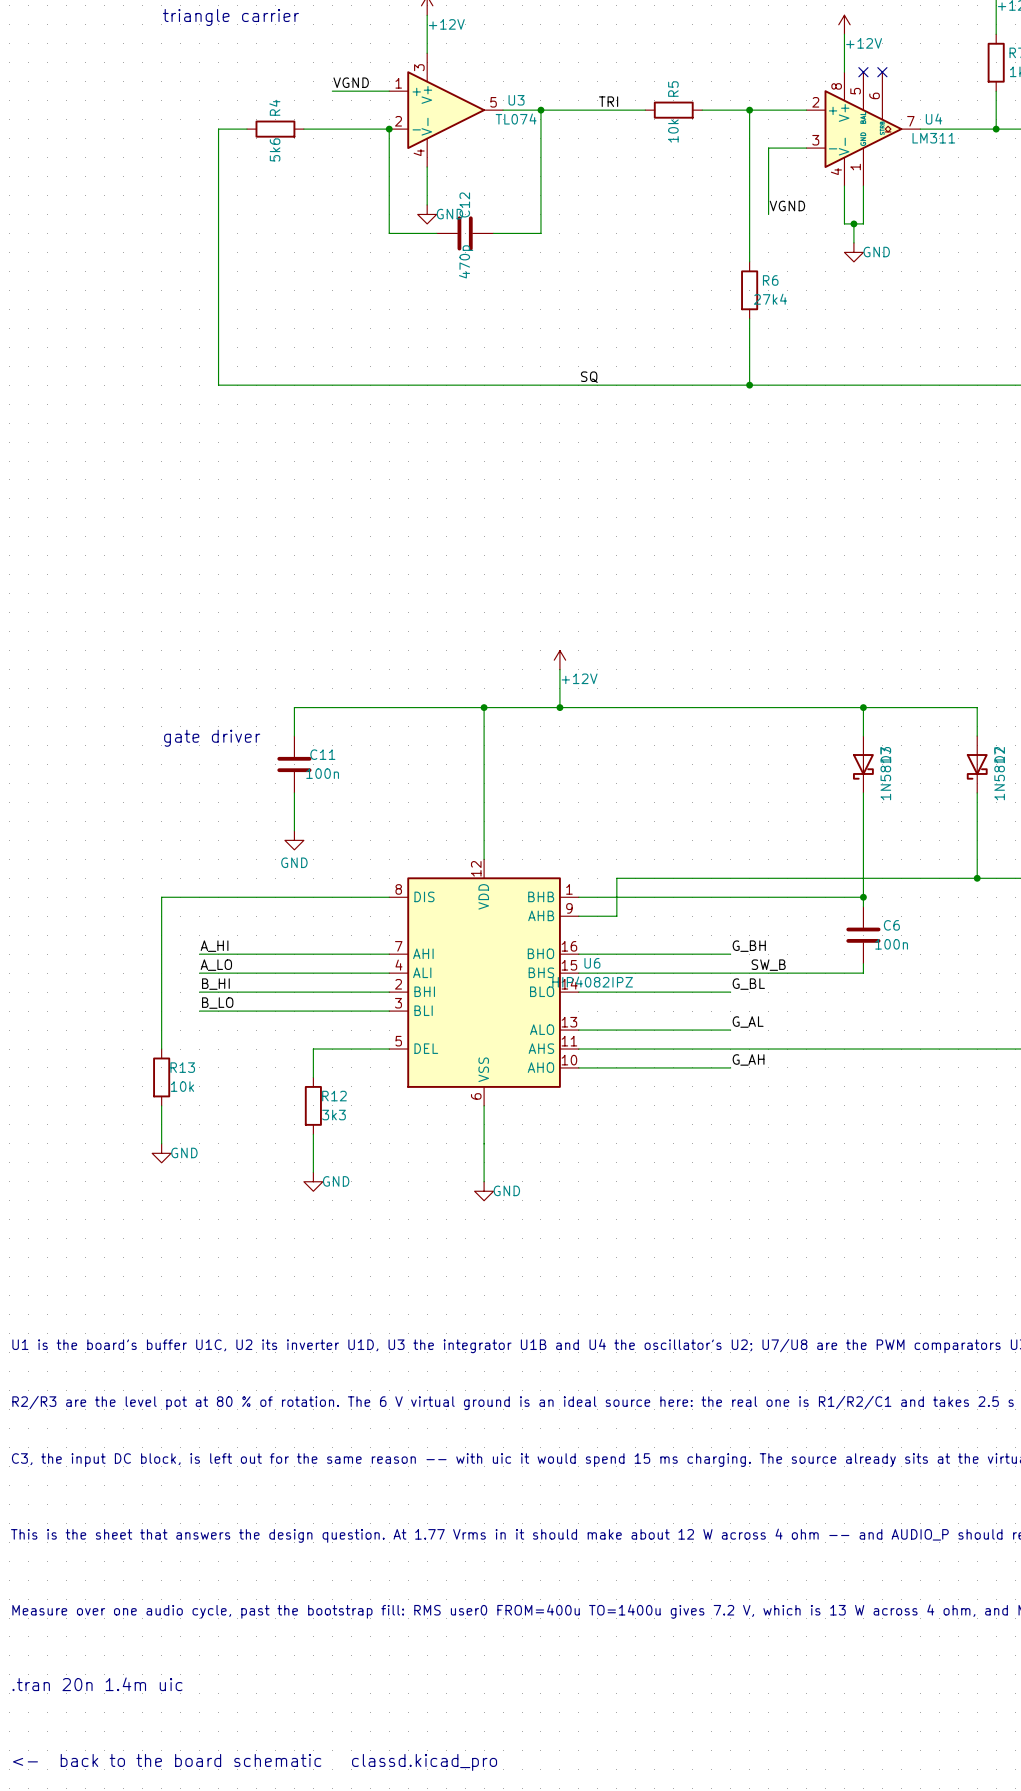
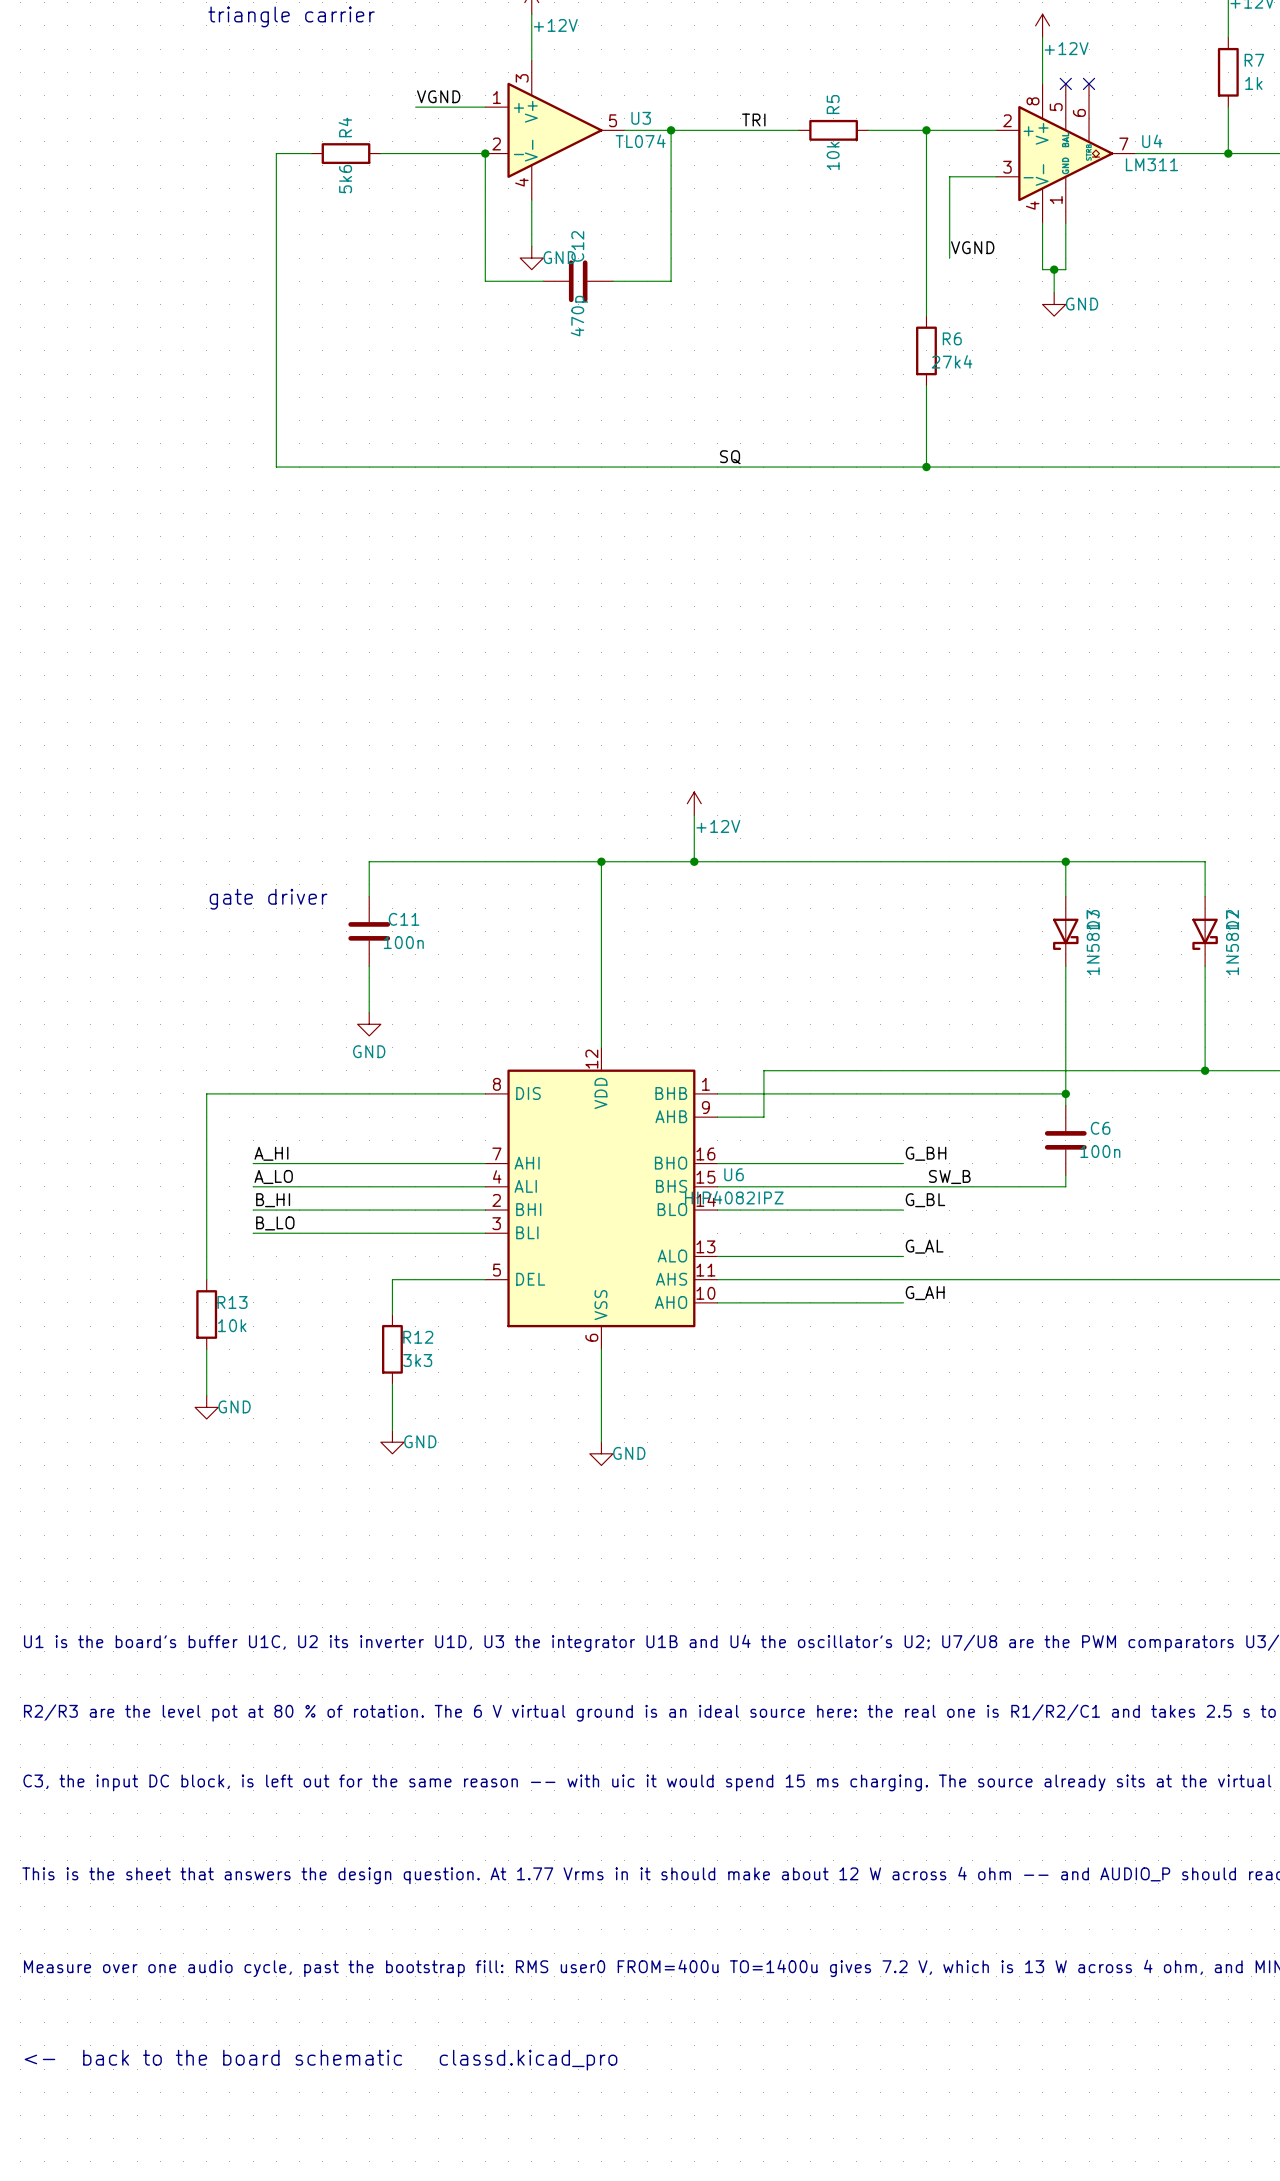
text: .tran 20n 1.4m uic (97, 1684) -> <- back to the board schematic classd.kicad_pro (321, 2060)
text: <- back to the board schematic classd.kicad_pro (255, 1762) -> none

